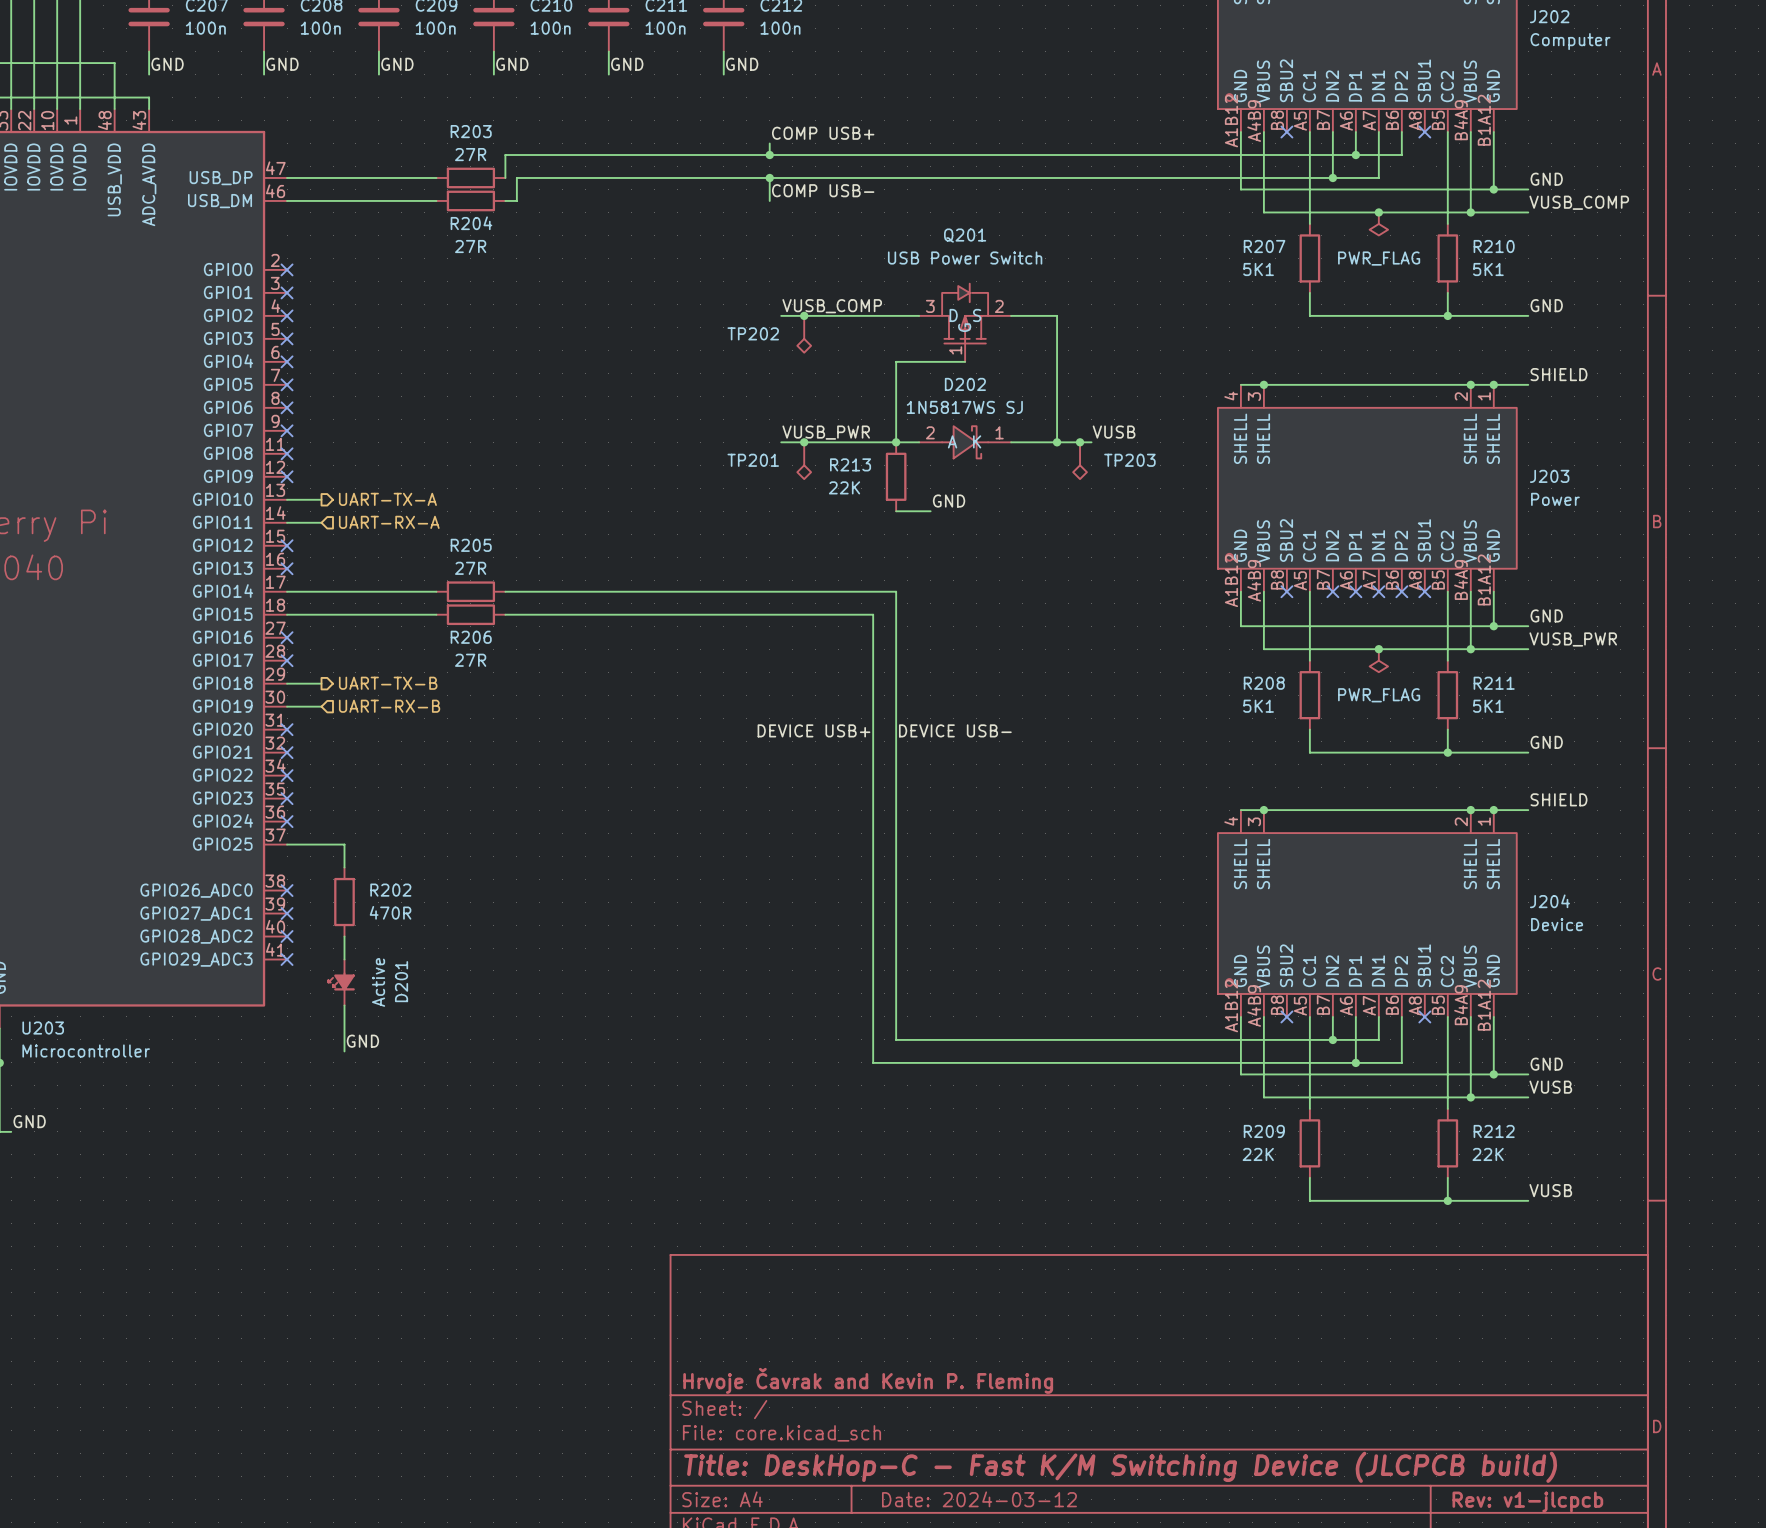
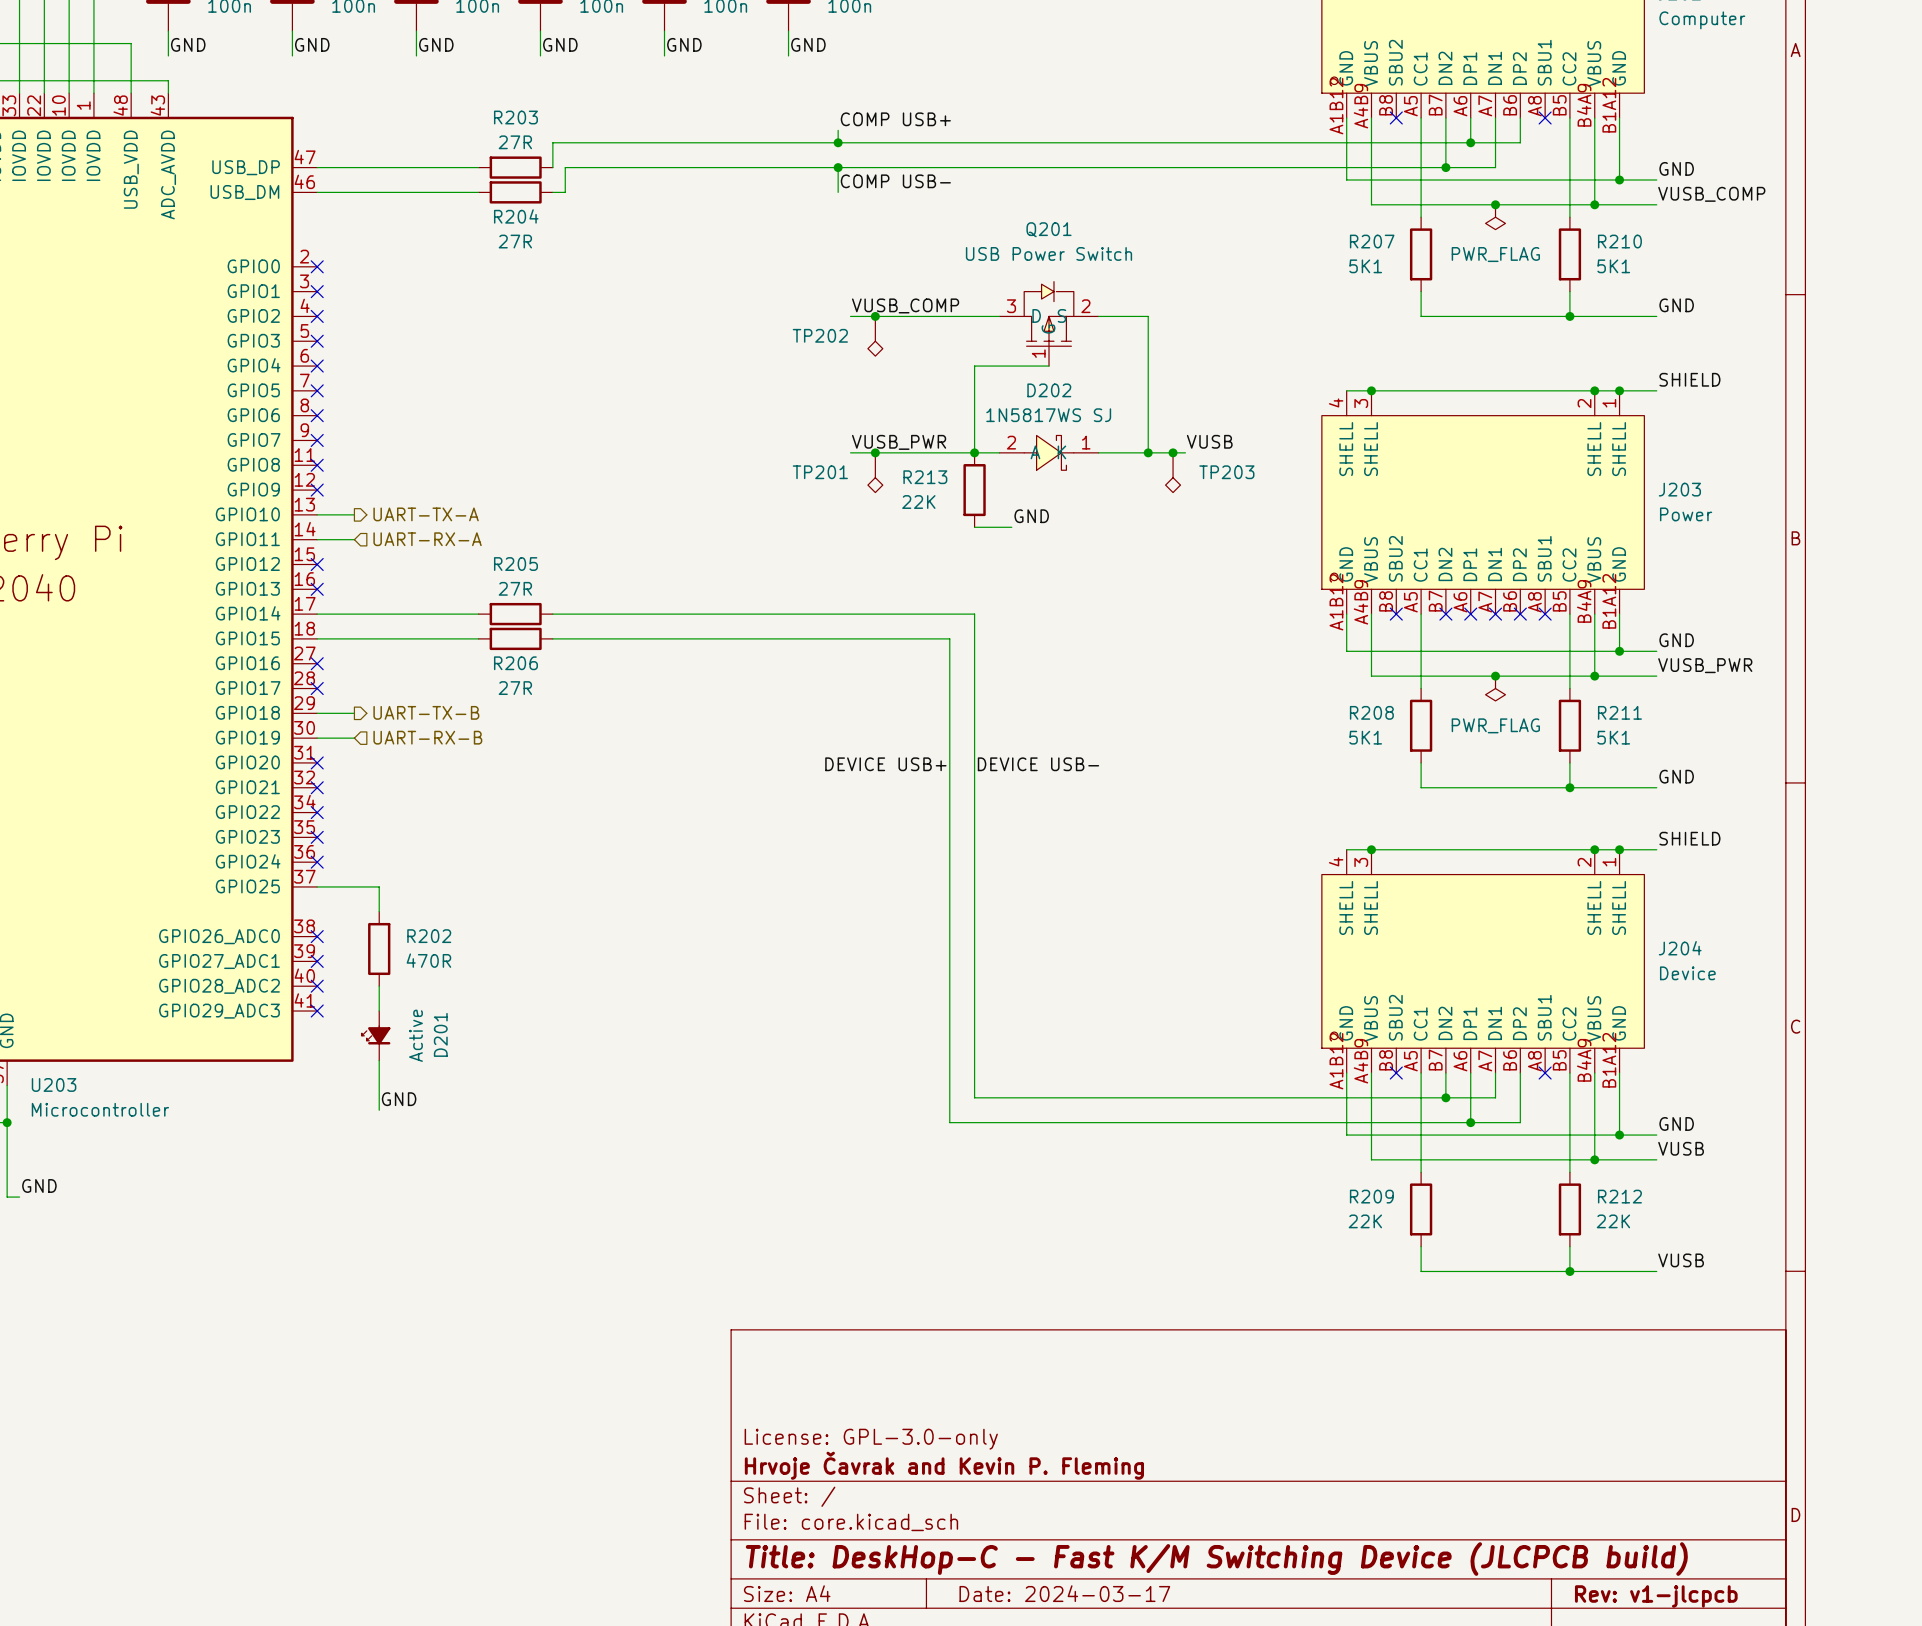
title block: none -> License: GPL-3.0-only (871, 1439)
title block: Date: 2024-03-12 (979, 1499) -> Date: 2024-03-17 (1064, 1593)

